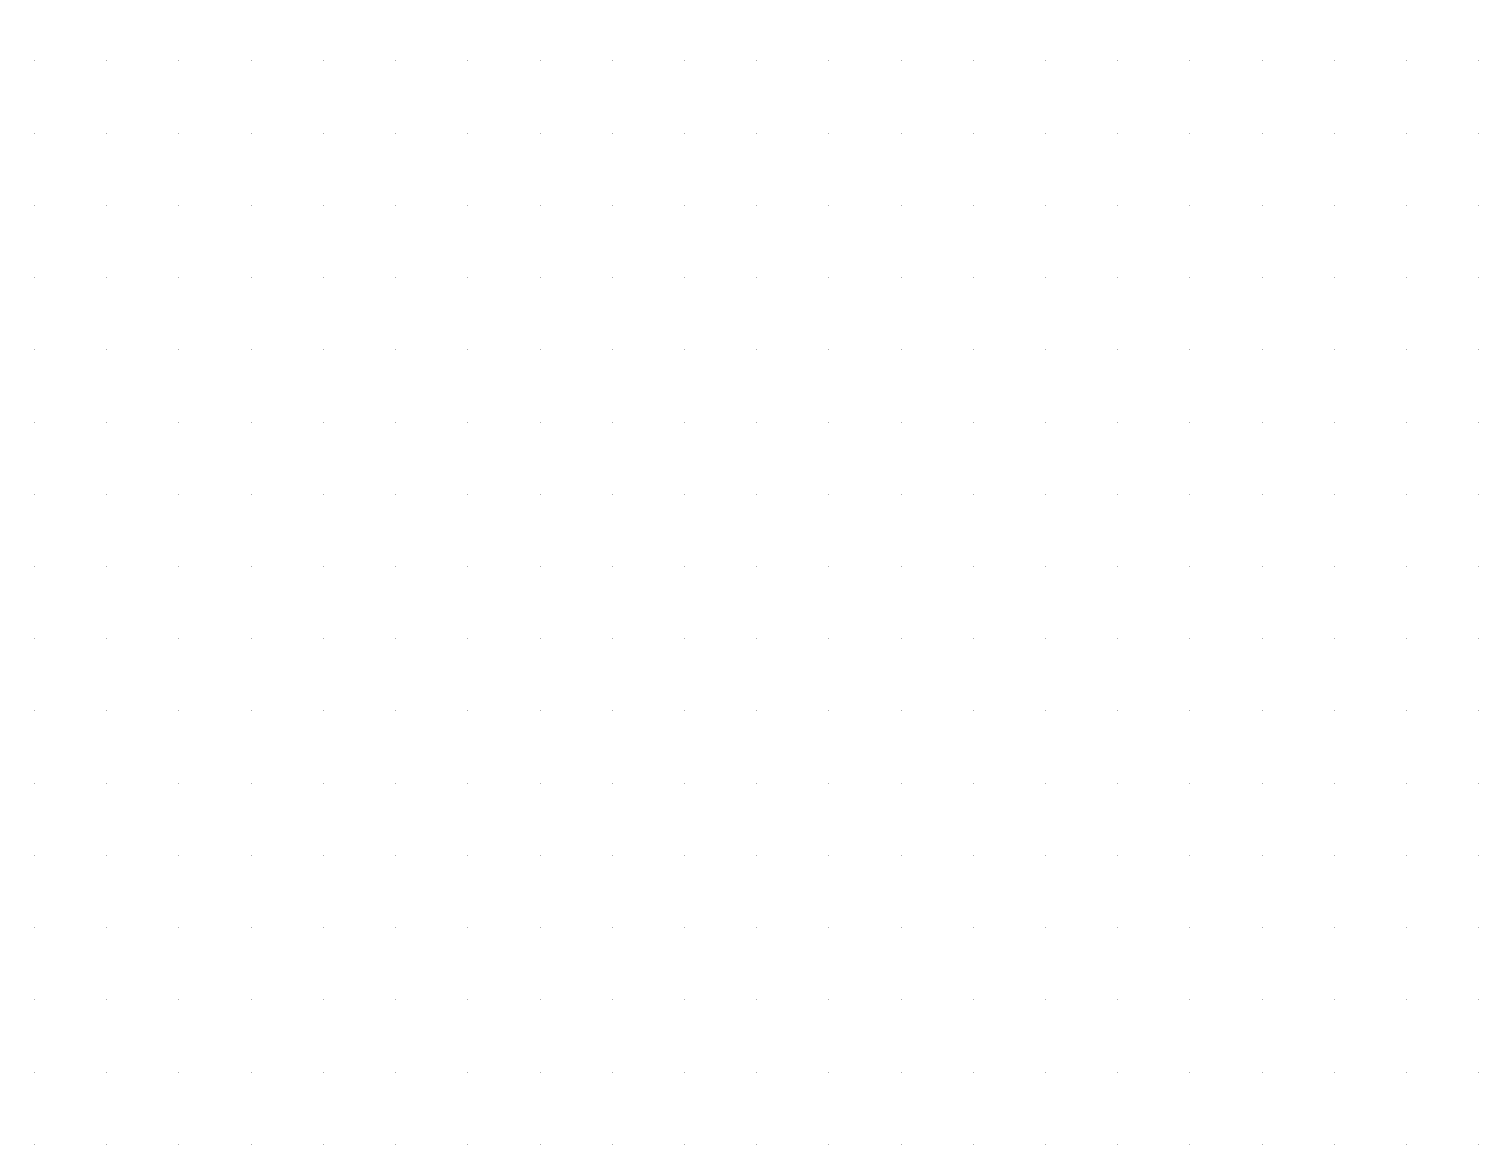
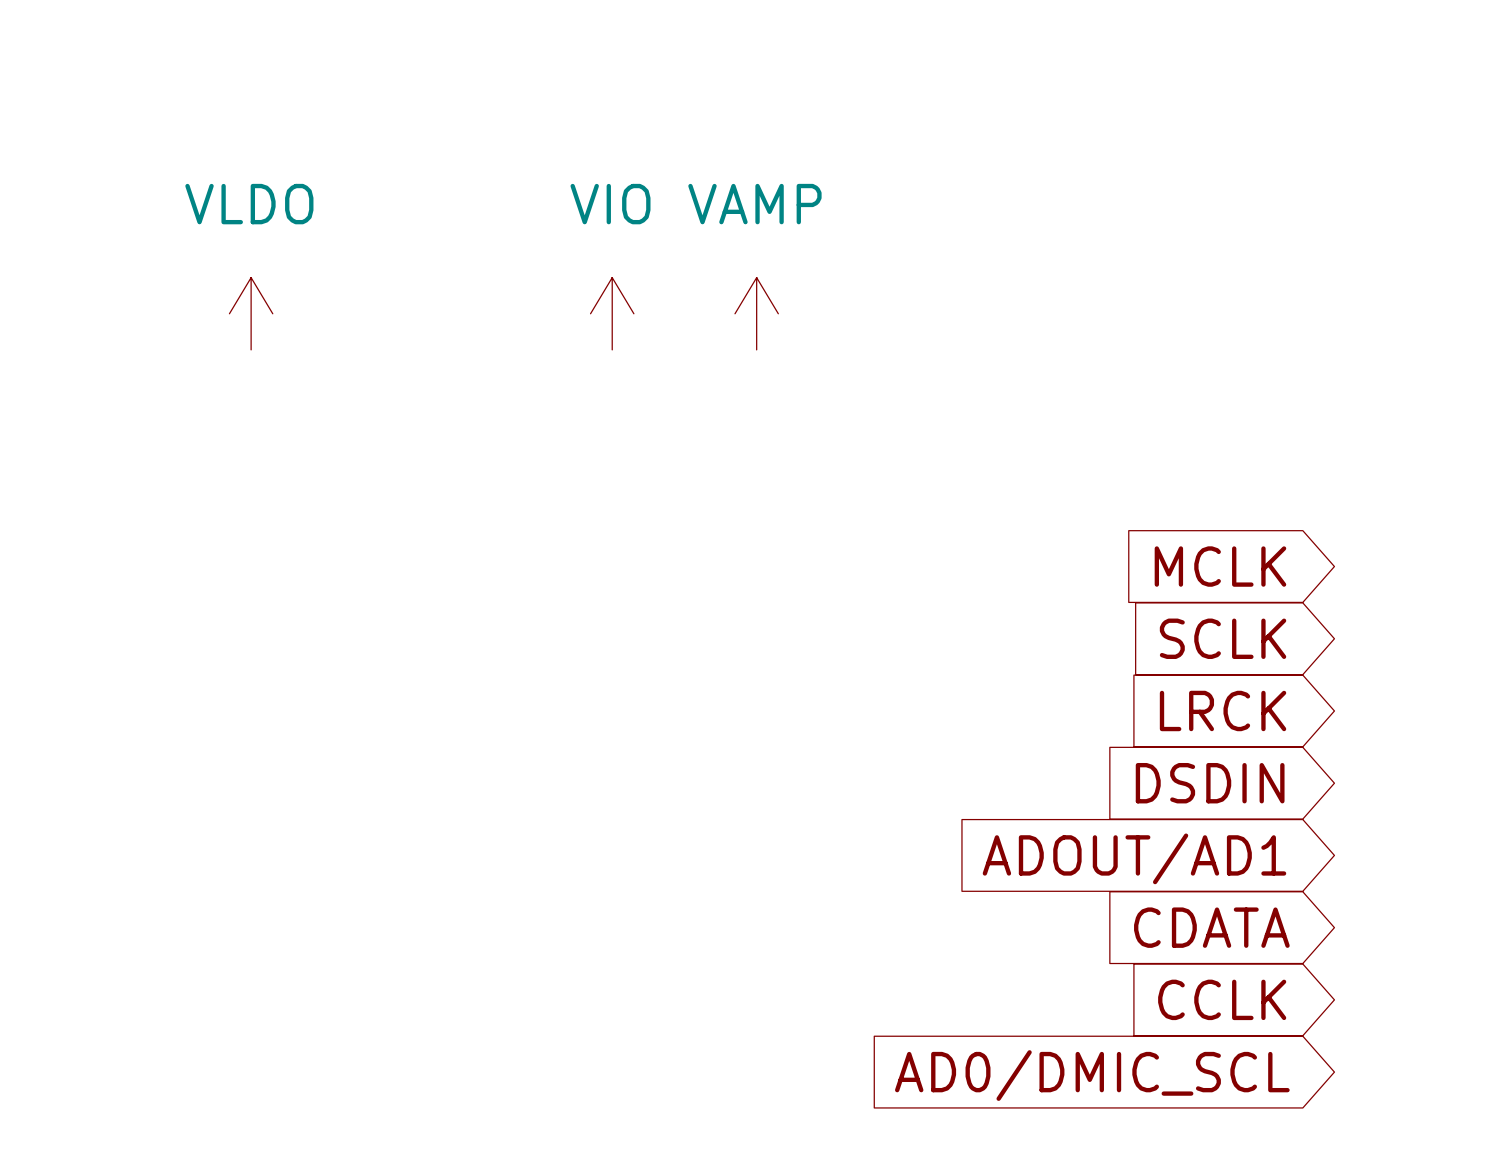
power symbol: none -> VLDO (251, 313)
power symbol: none -> VIO (612, 313)
power symbol: none -> VAMP (756, 313)
global label: none -> MCLK (1220, 566)
global label: none -> SCLK (1223, 638)
global label: none -> LRCK (1223, 710)
global label: none -> DSDIN (1210, 783)
global label: none -> ADOUT/AD1 (1134, 858)
global label: none -> CDATA (1211, 927)
global label: none -> CCLK (1222, 999)
global label: none -> AD0/DMIC_SCL (1092, 1075)

